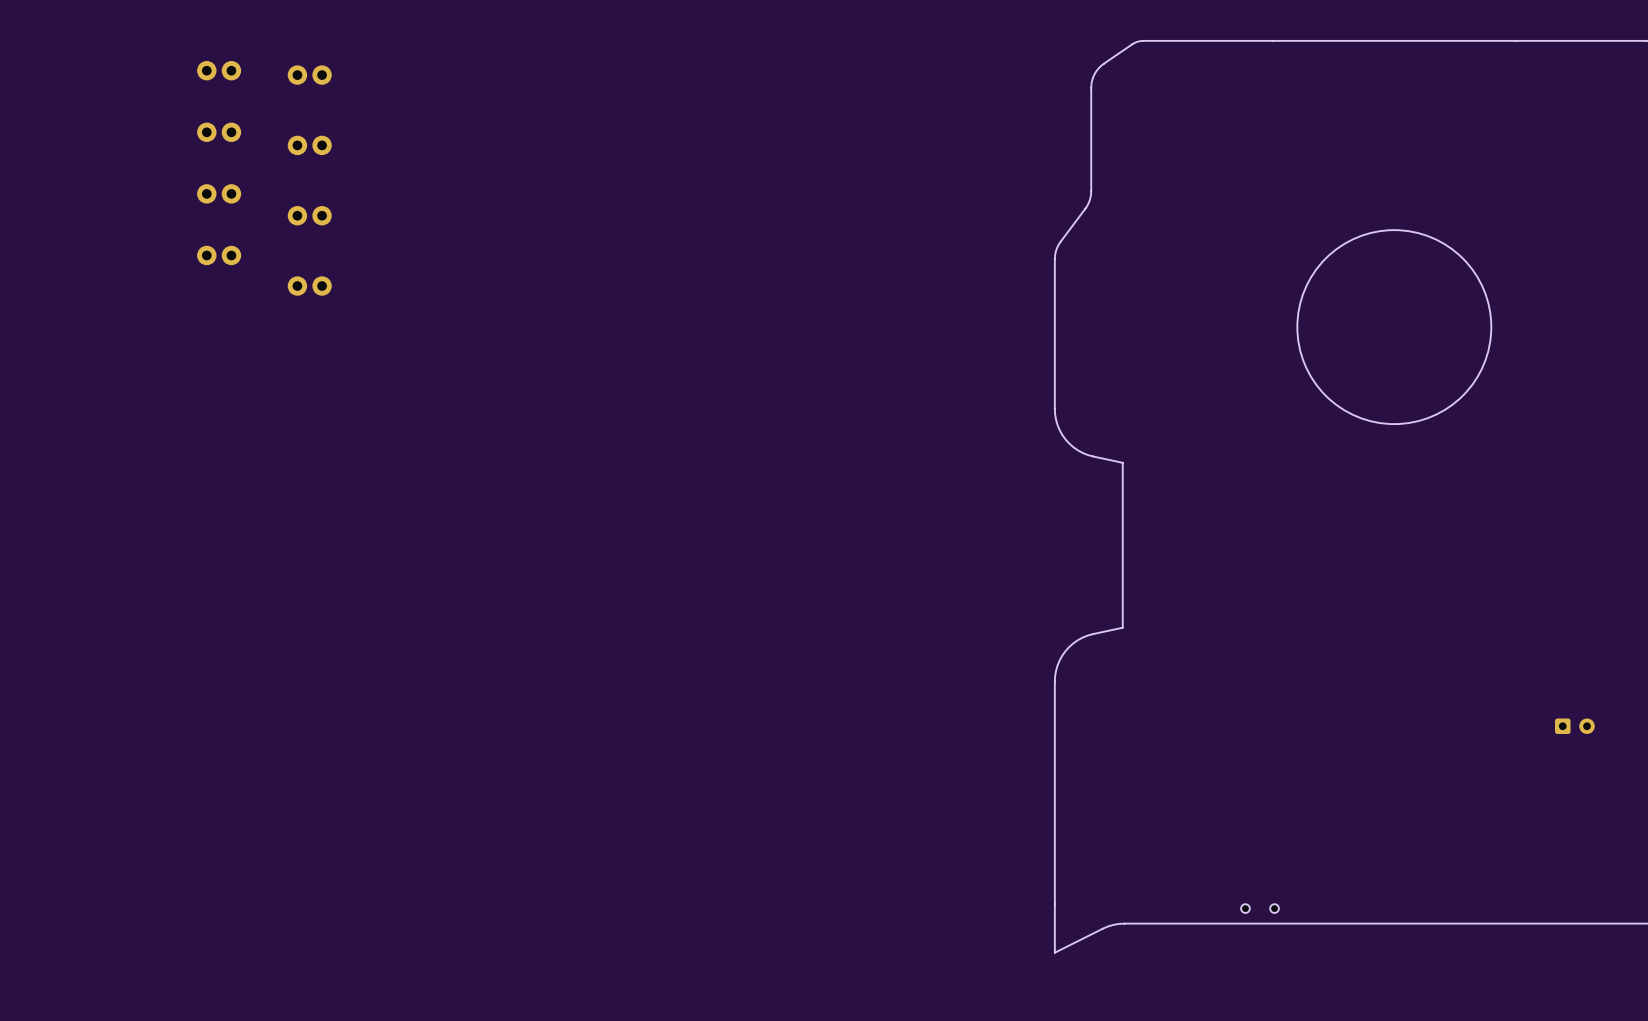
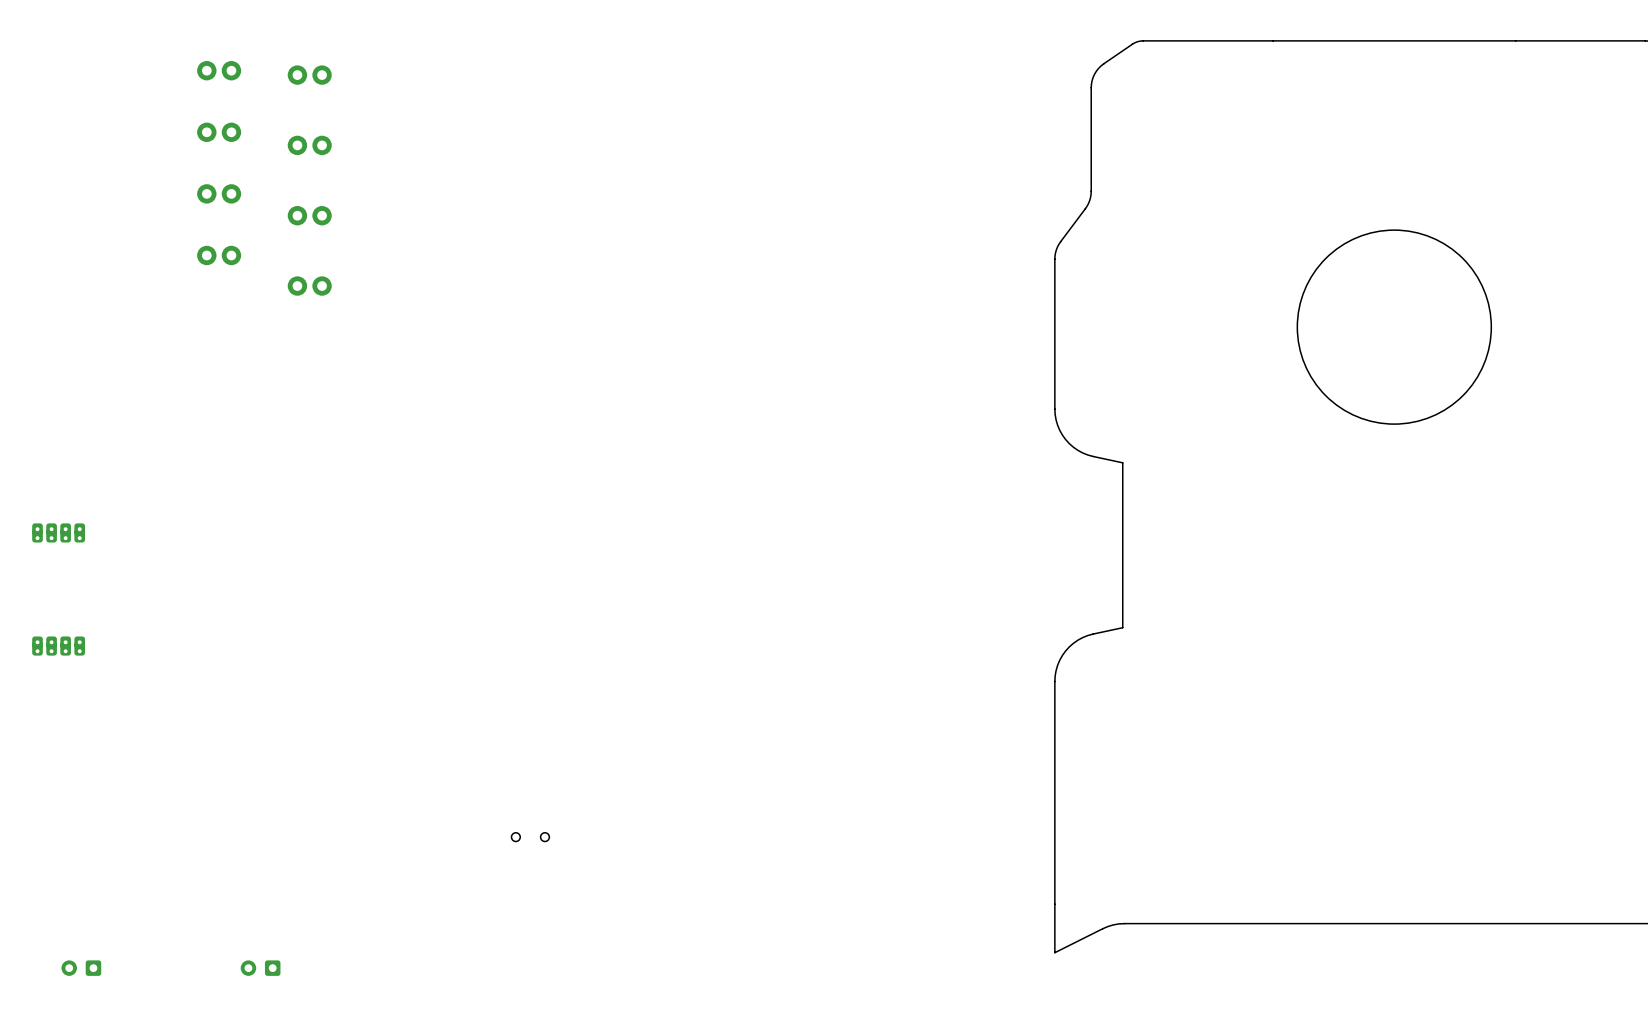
part: none -> (58, 532)
part: none -> (58, 646)
part: (1574, 726) -> none
part: none -> (530, 837)
part: (1259, 908) -> none
part: none -> (81, 968)
part: none -> (260, 968)

